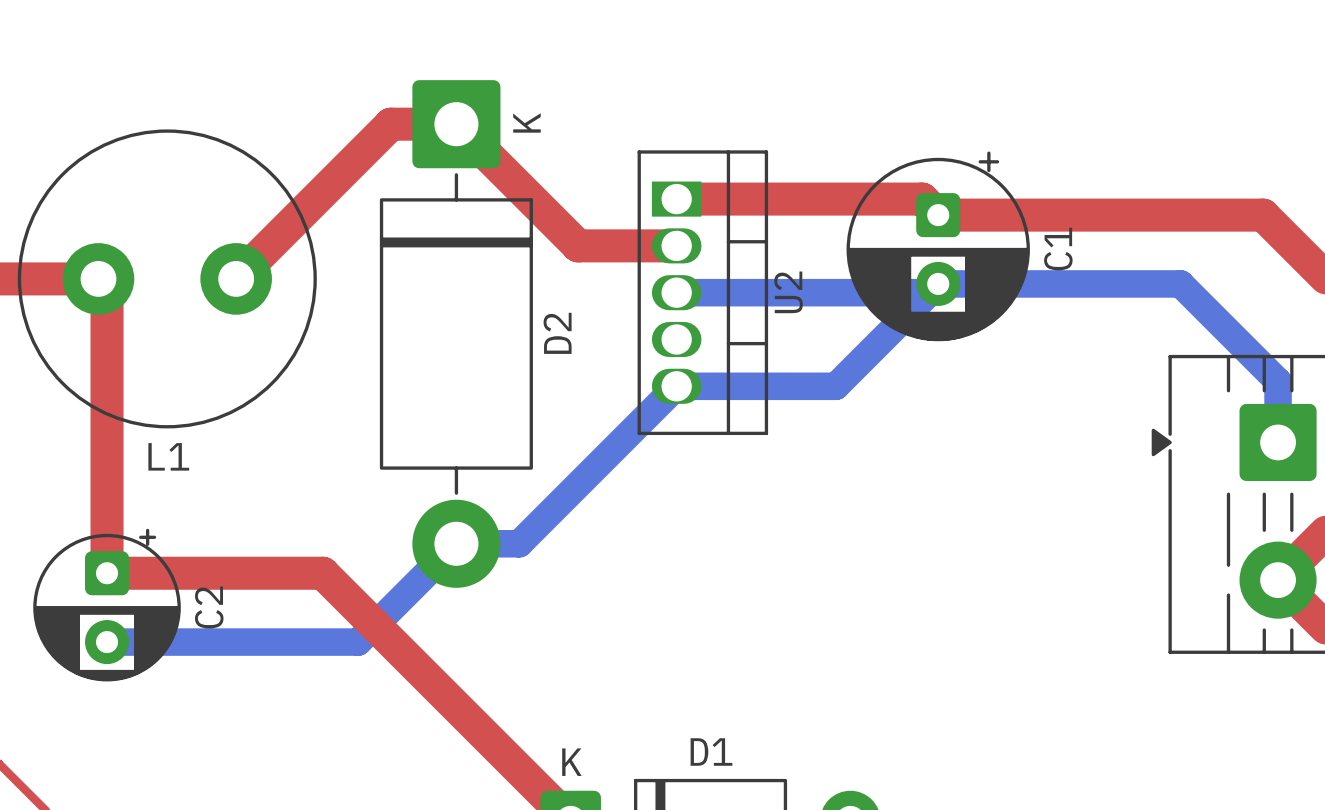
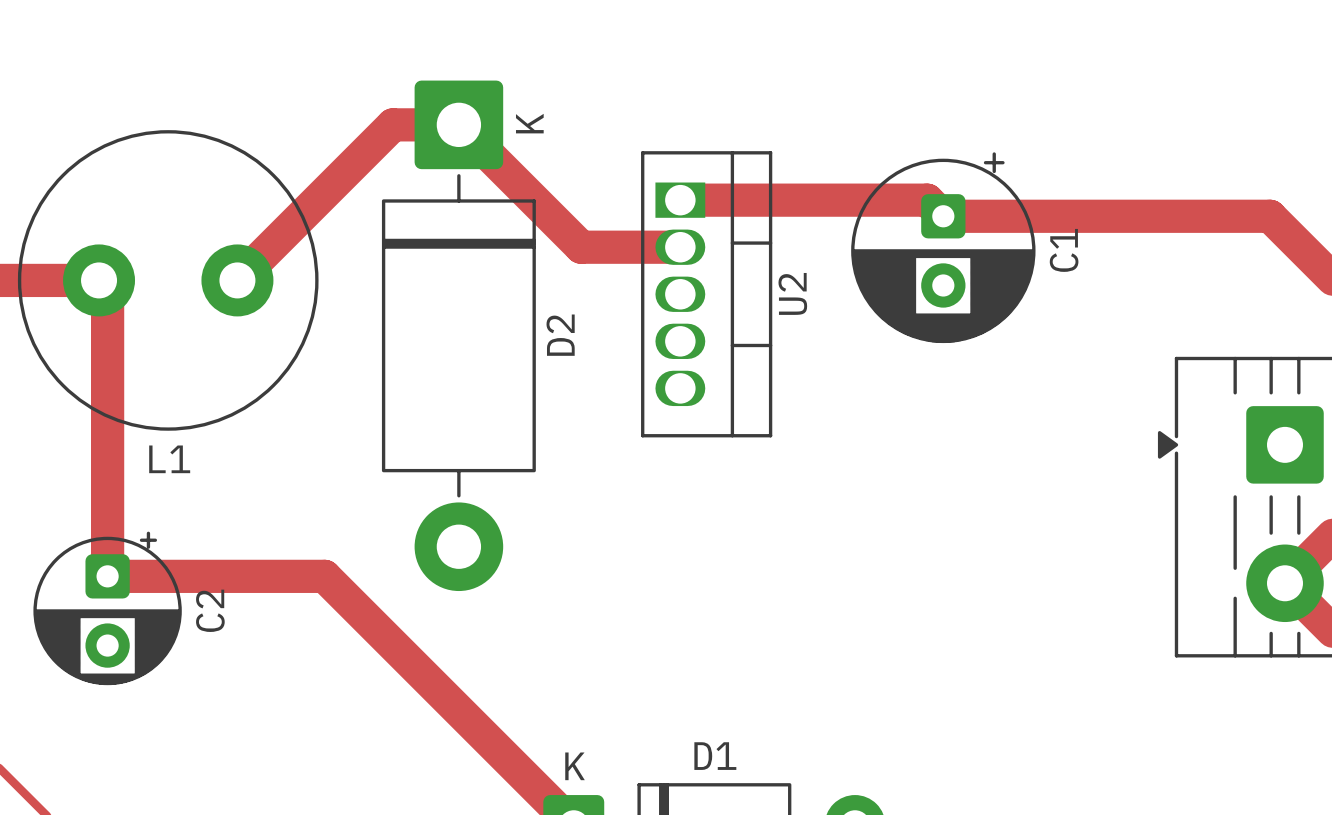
bottom track: (676, 292) (929, 292) -> none
bottom track: (1278, 442) (1278, 381) (1180, 283) (938, 283) (835, 386) (676, 386) (519, 543) (456, 543) (358, 642) (107, 642) -> none

